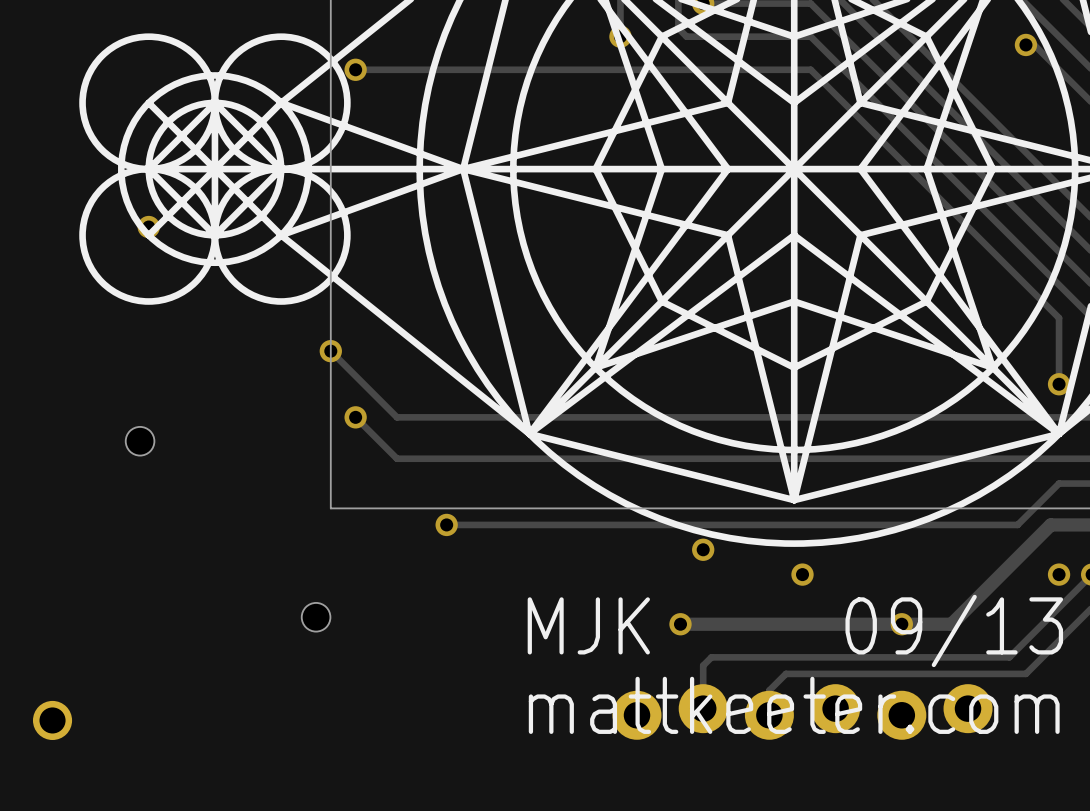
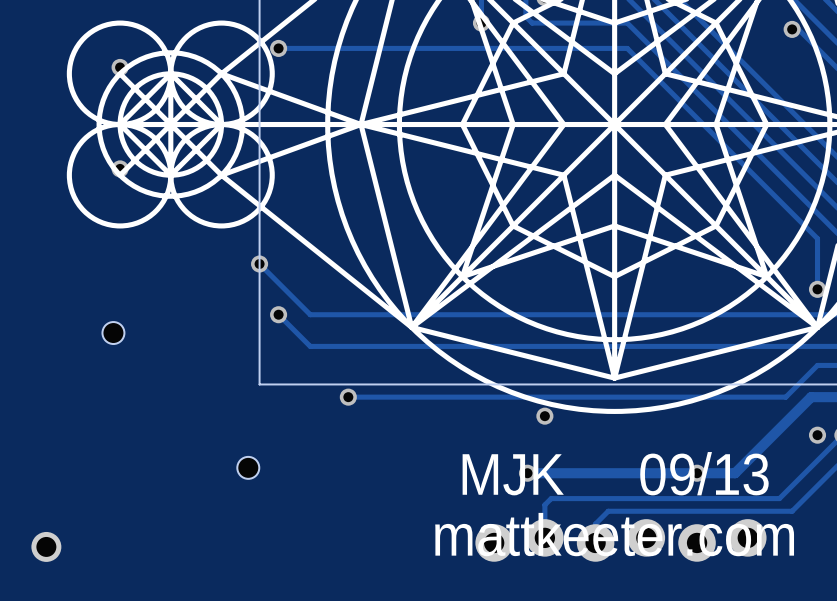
via: none -> (120, 67)
via: (802, 574) -> none

